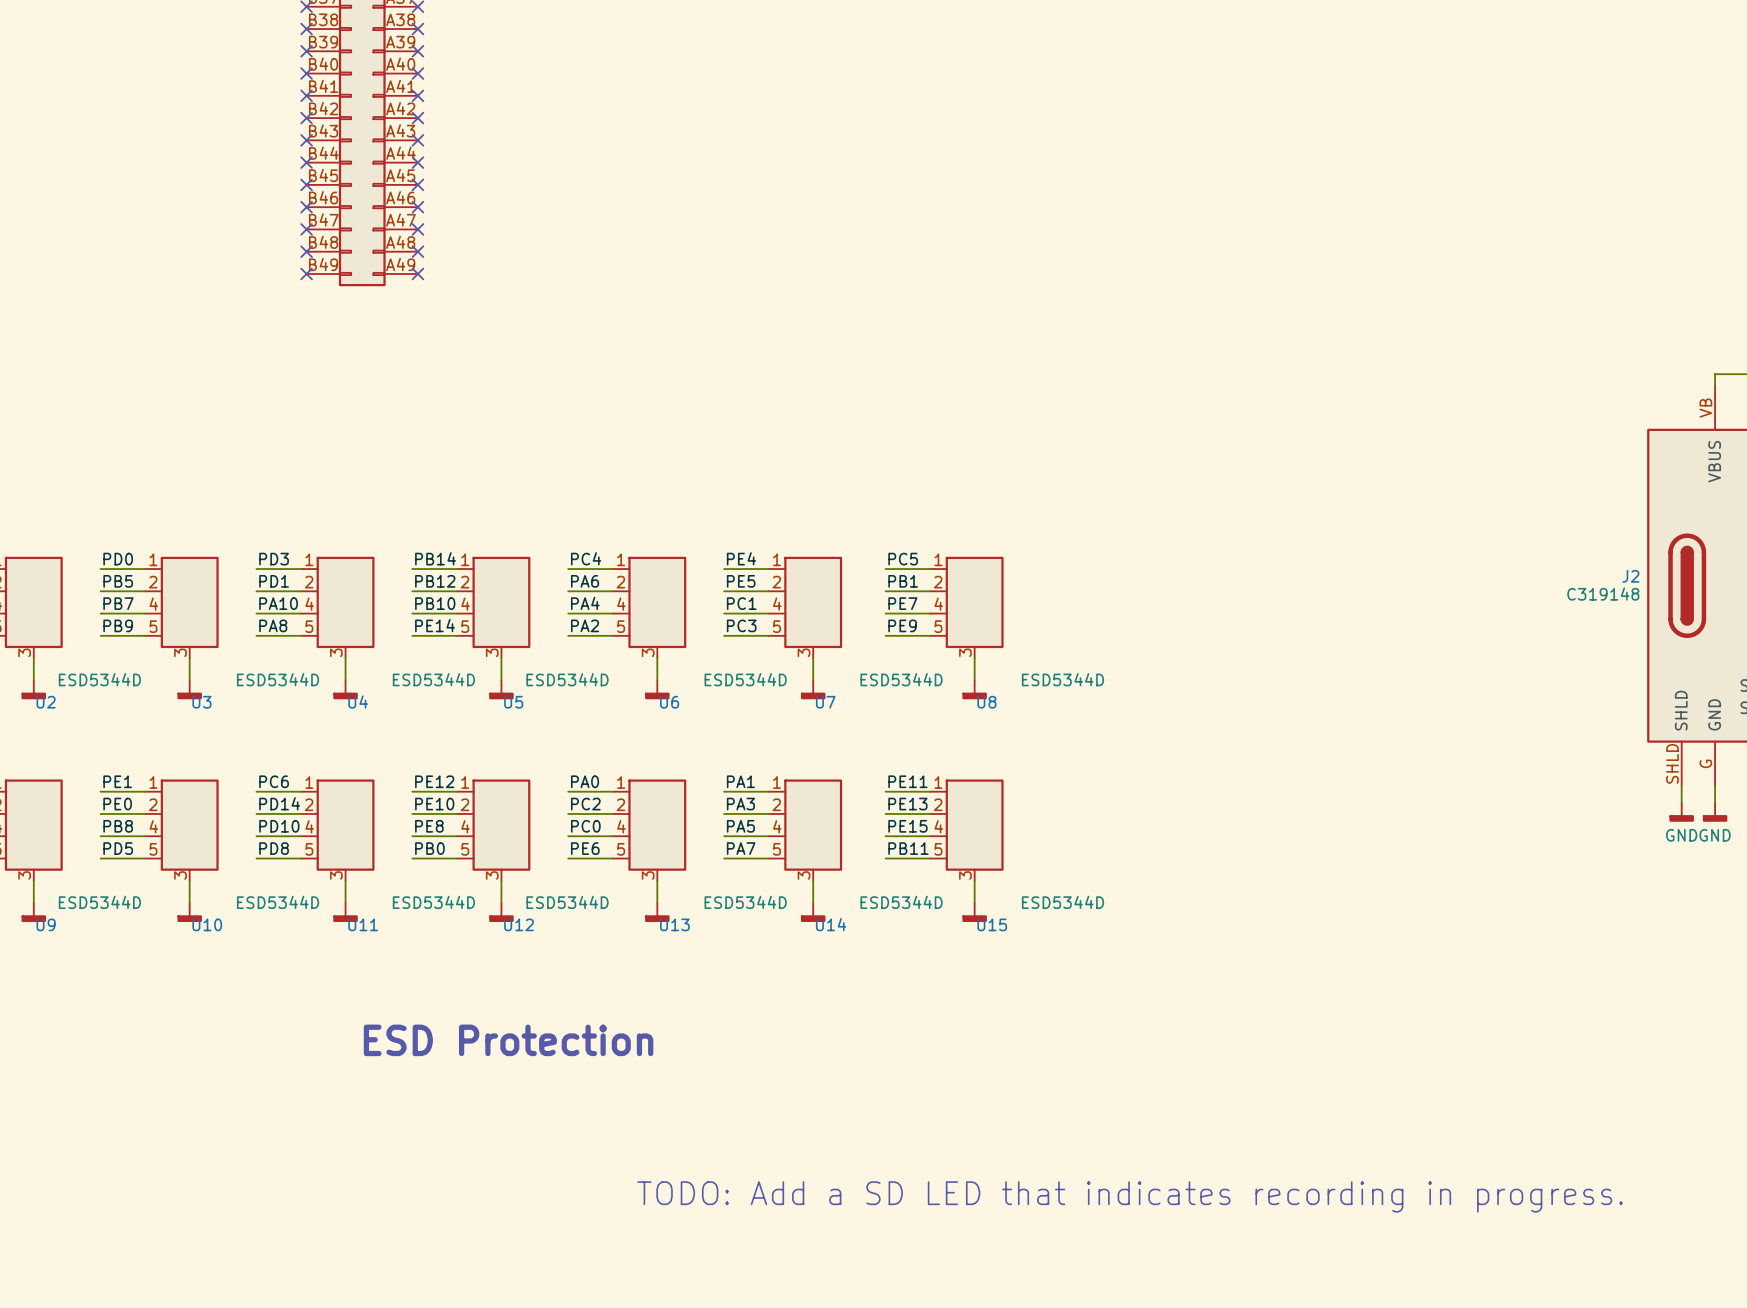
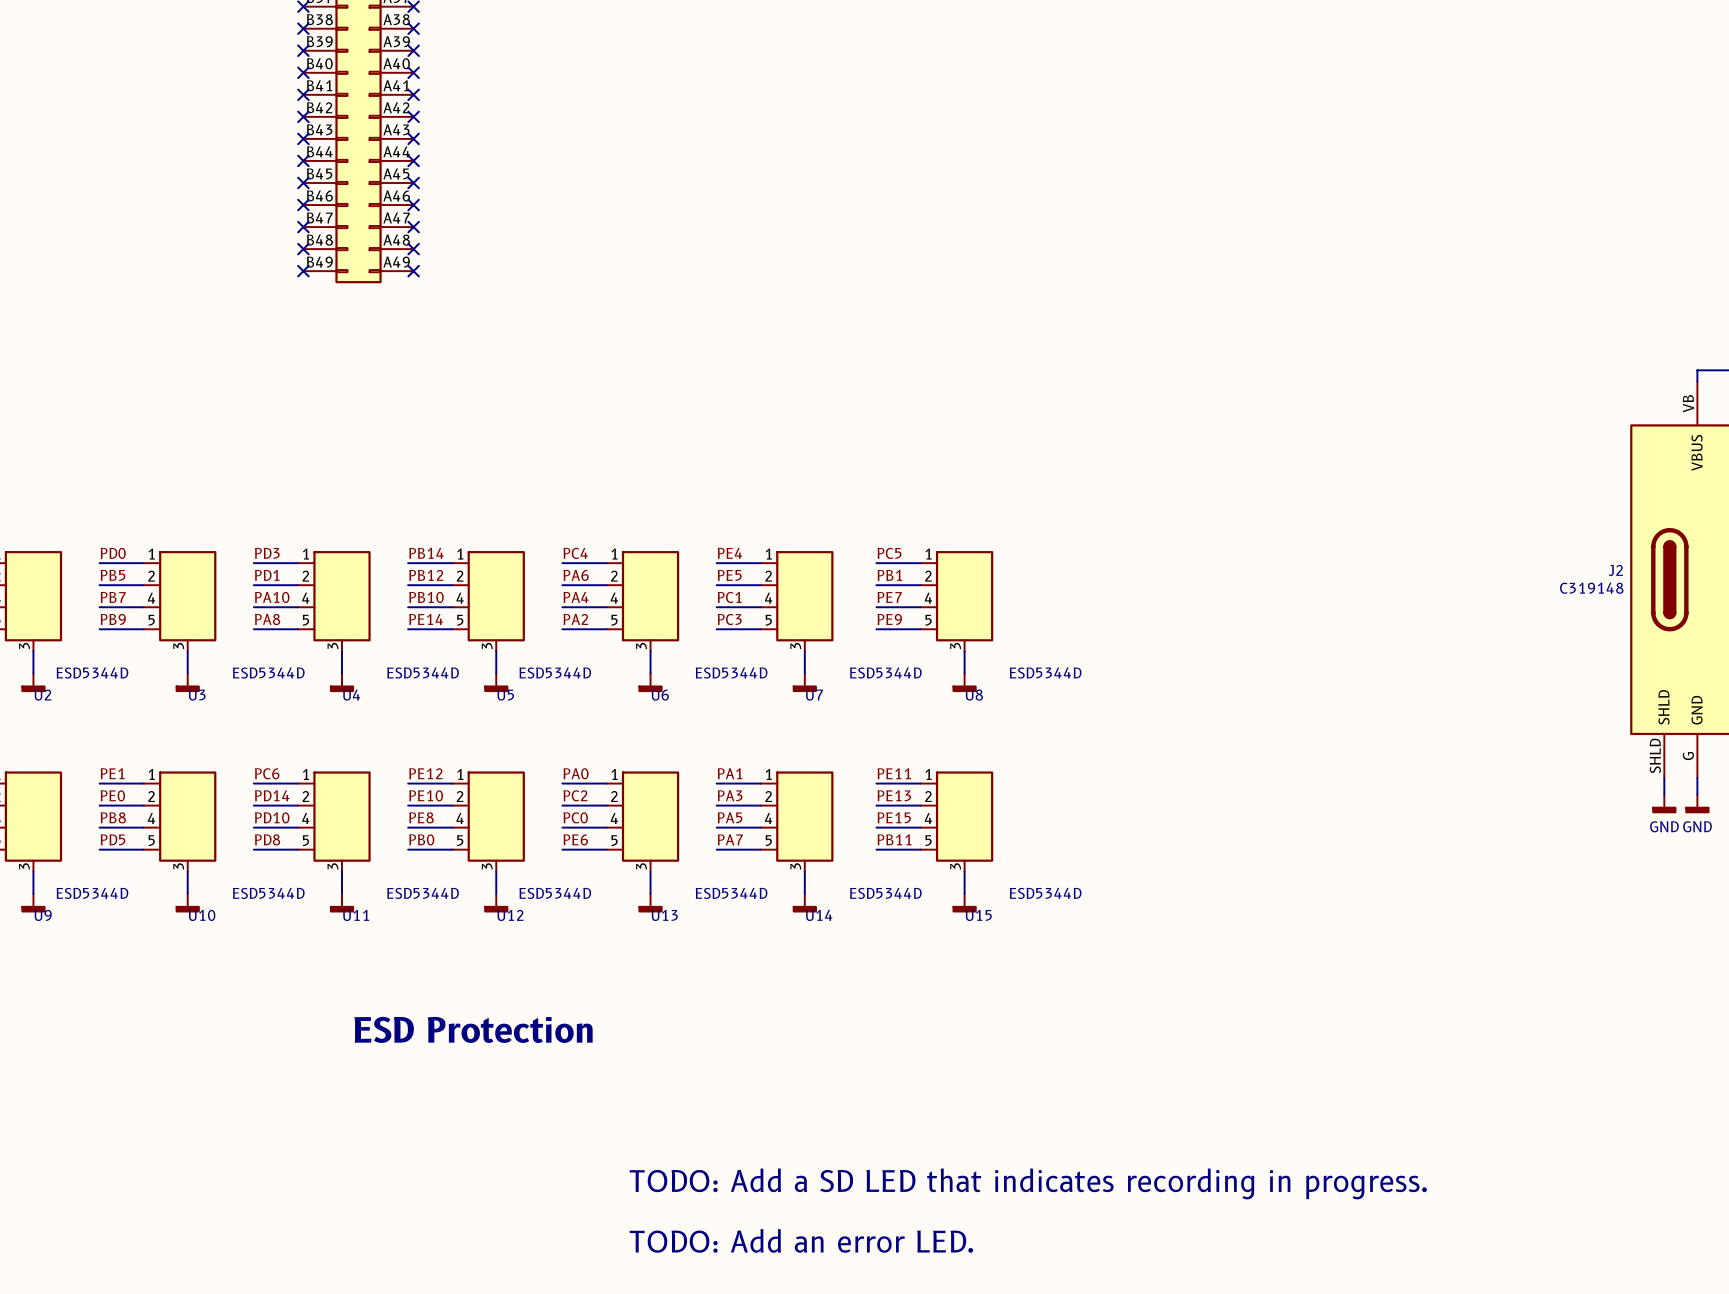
text: none -> TODO: Add an error LED. (801, 1240)

